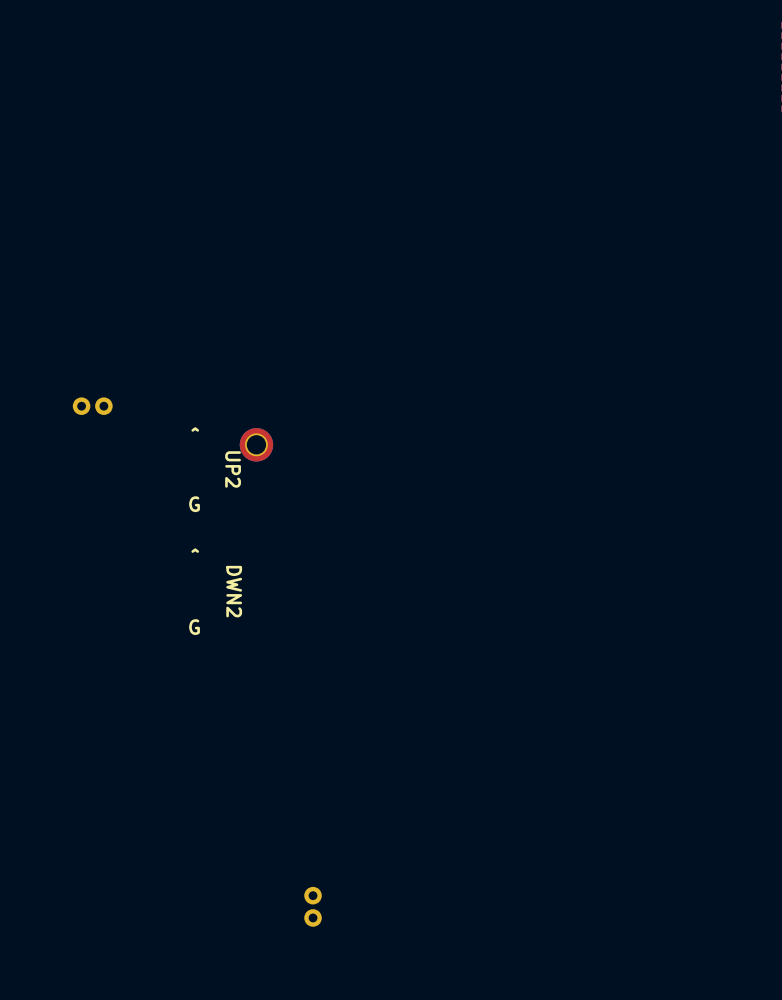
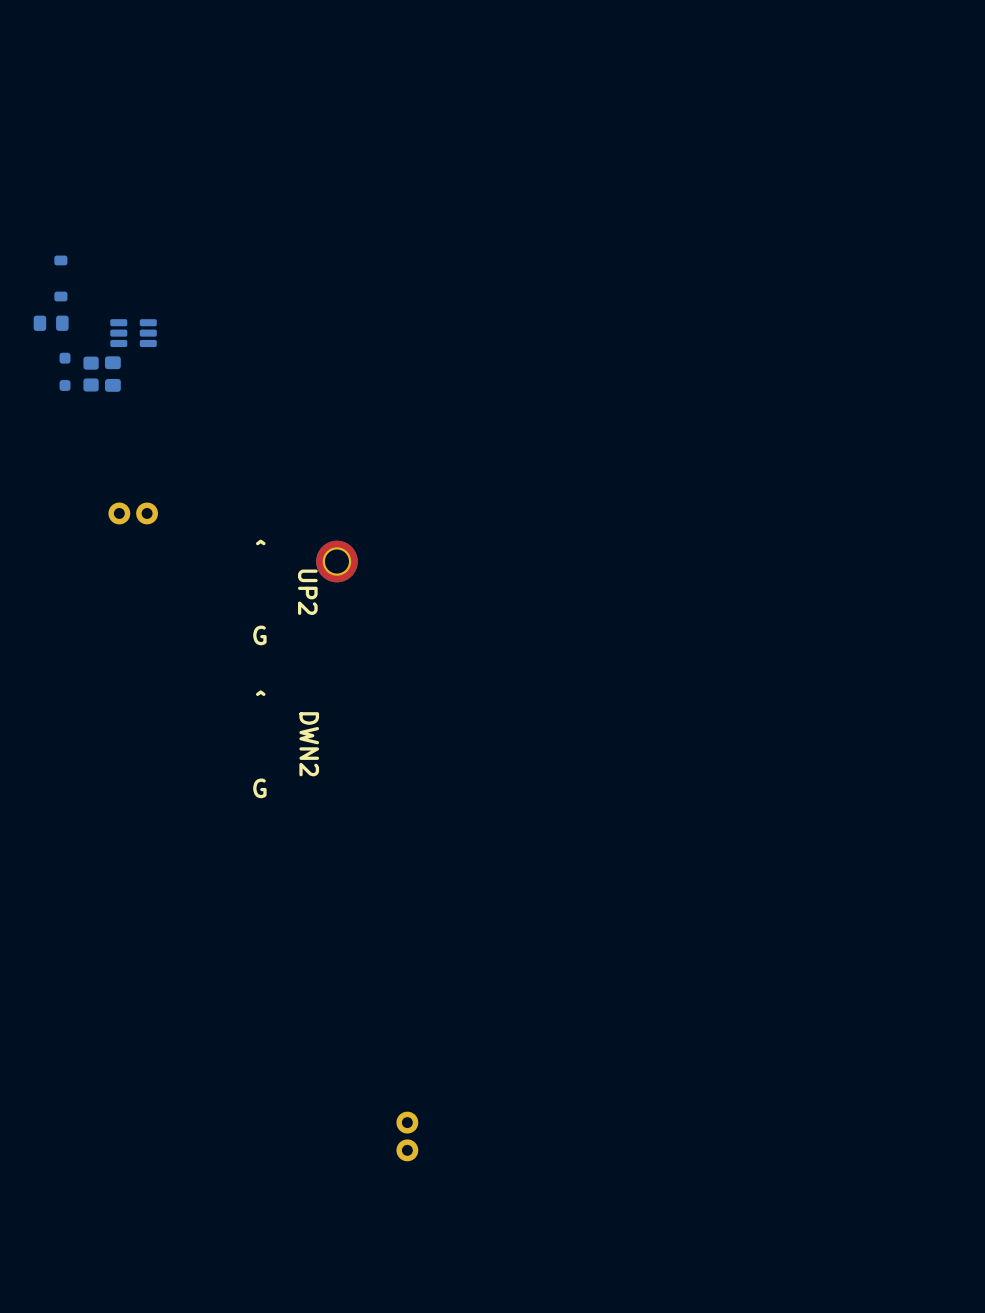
part: none -> (60, 278)
part: none -> (51, 323)
part: none -> (133, 333)
part: none -> (65, 371)
part: none -> (91, 374)
part: none -> (112, 374)

